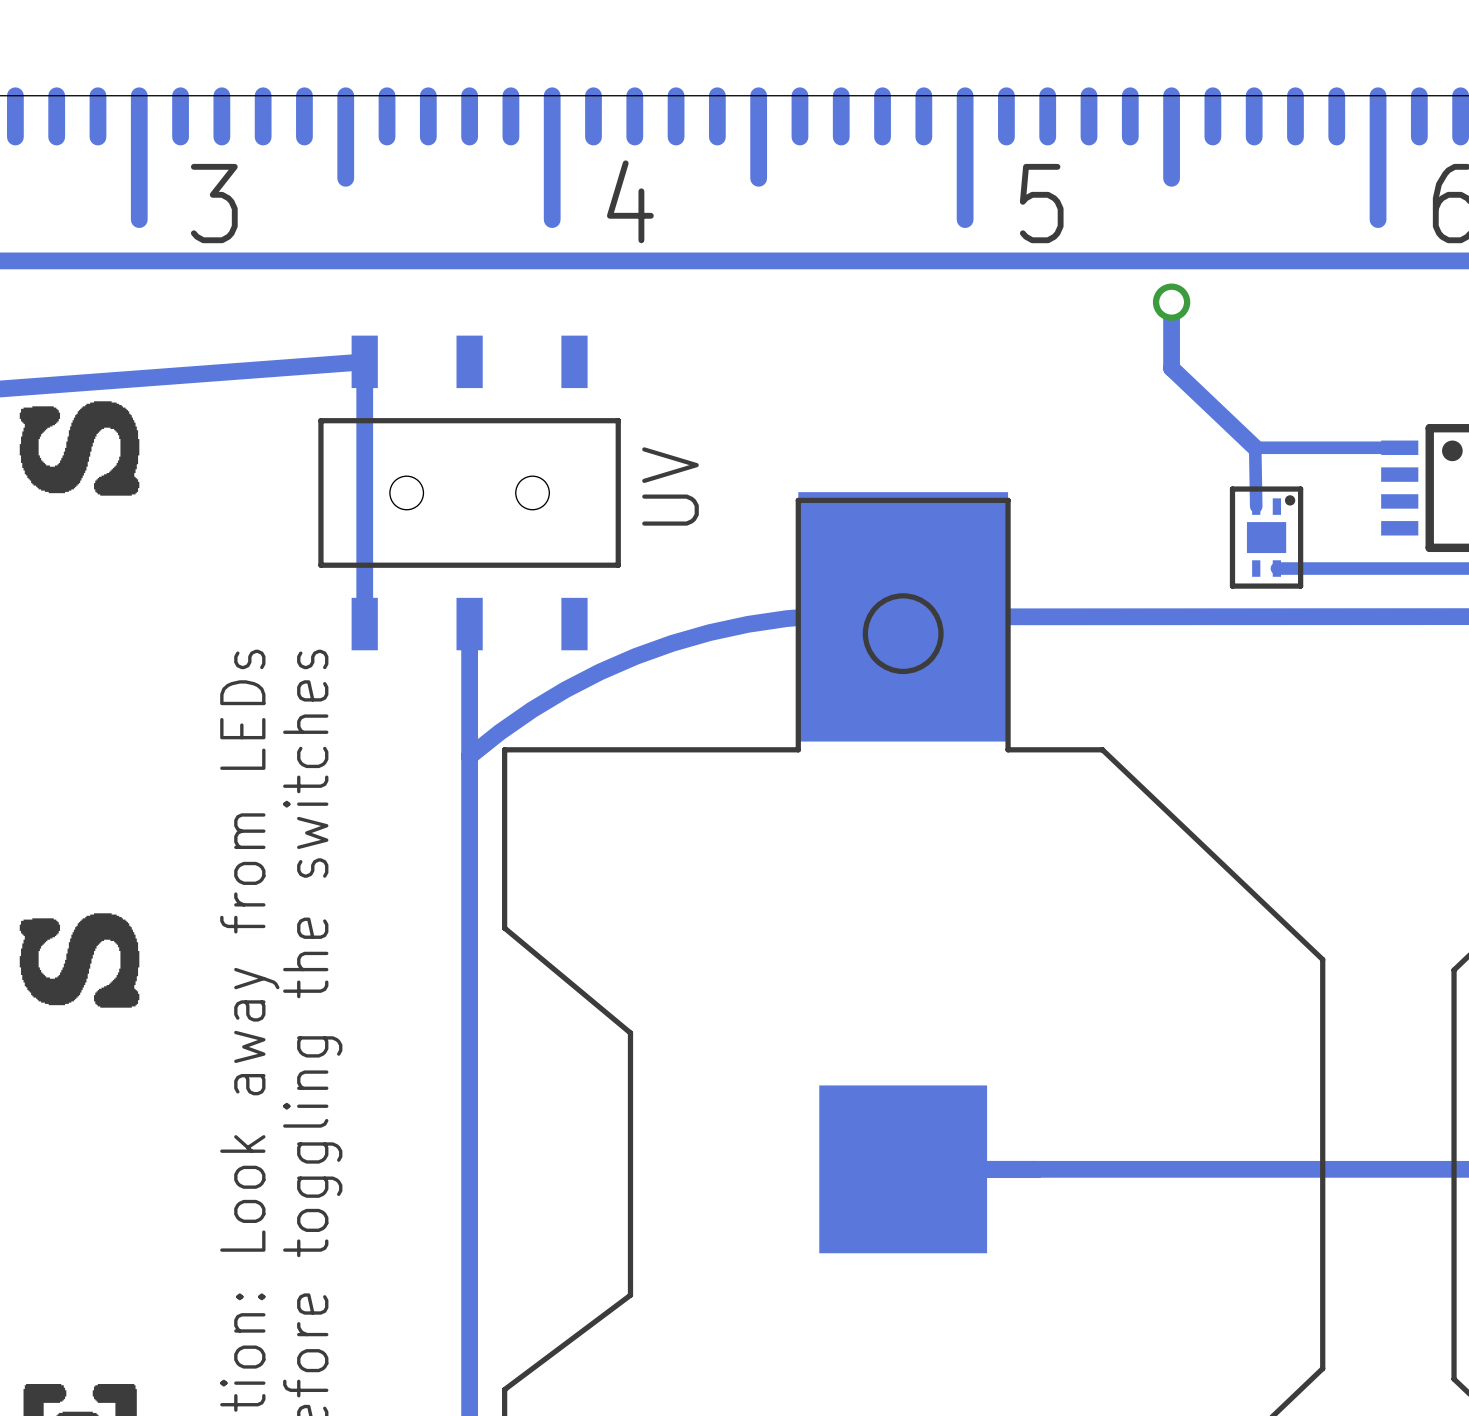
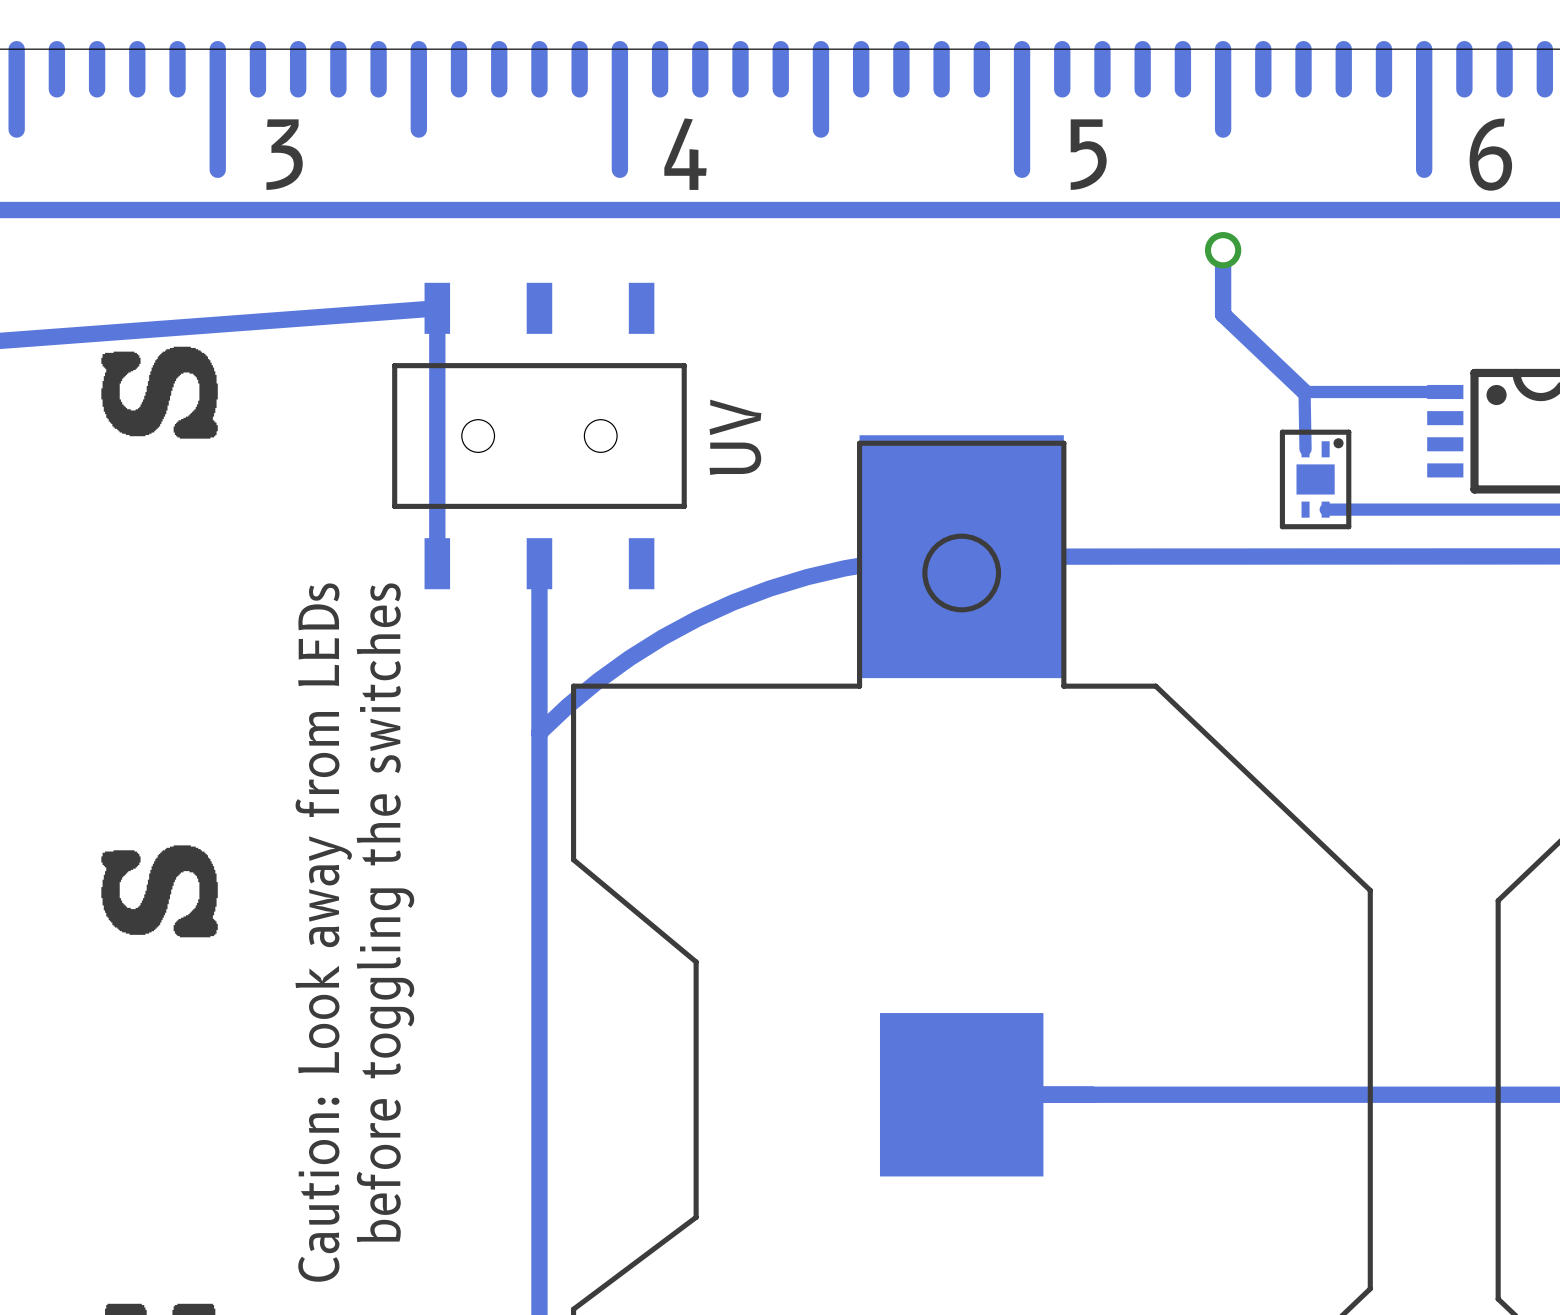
track: (903, 616) (864, 614) (786, 618) (709, 632) (672, 643) (635, 656) (565, 689) (500, 732) (469, 756) -> (961, 556) (883, 561) (845, 568) (769, 588) (732, 602) (697, 618) (629, 658) (567, 705) (539, 732)

